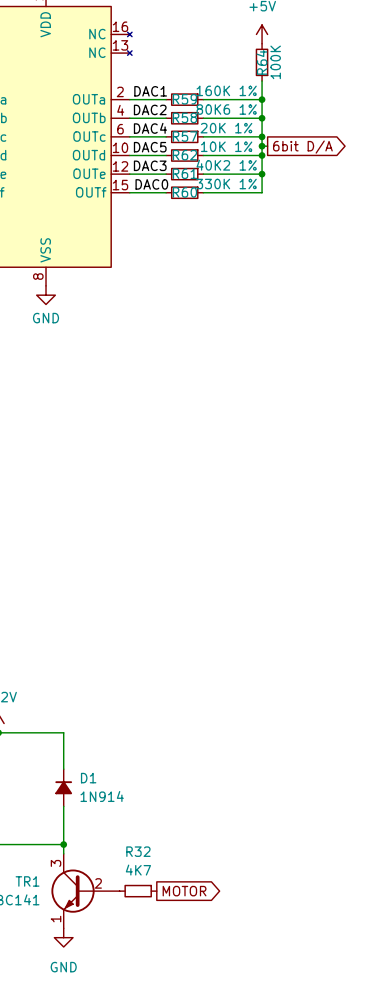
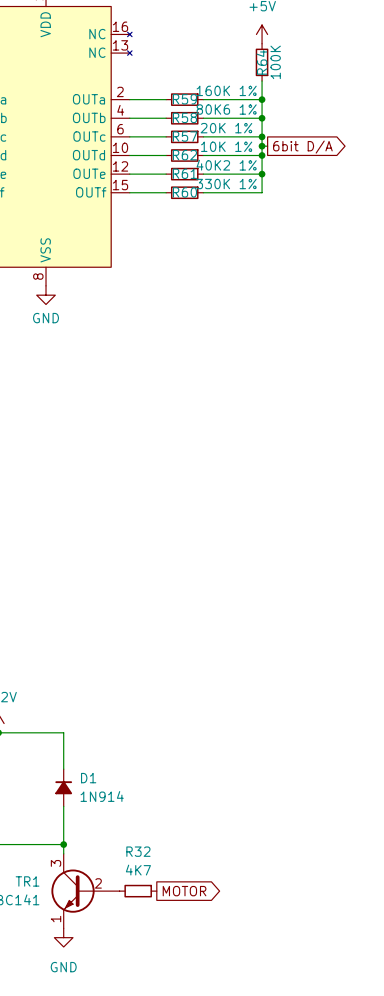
label: DAC1 (150, 91) -> none
label: DAC2 (150, 109) -> none
label: DAC4 (150, 128) -> none
label: DAC5 (150, 147) -> none
label: DAC3 (150, 165) -> none
label: DAC0 (151, 184) -> none

